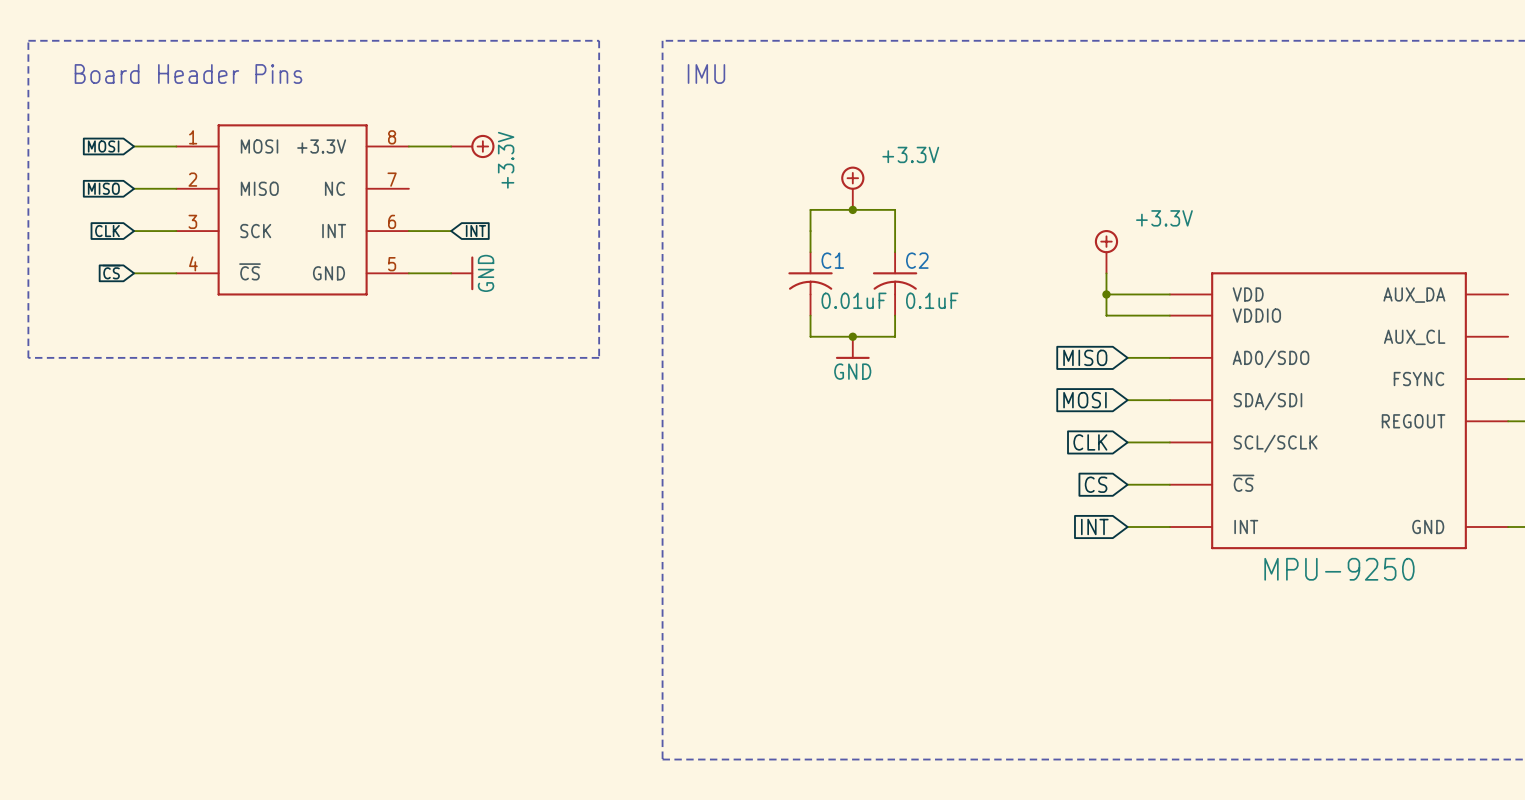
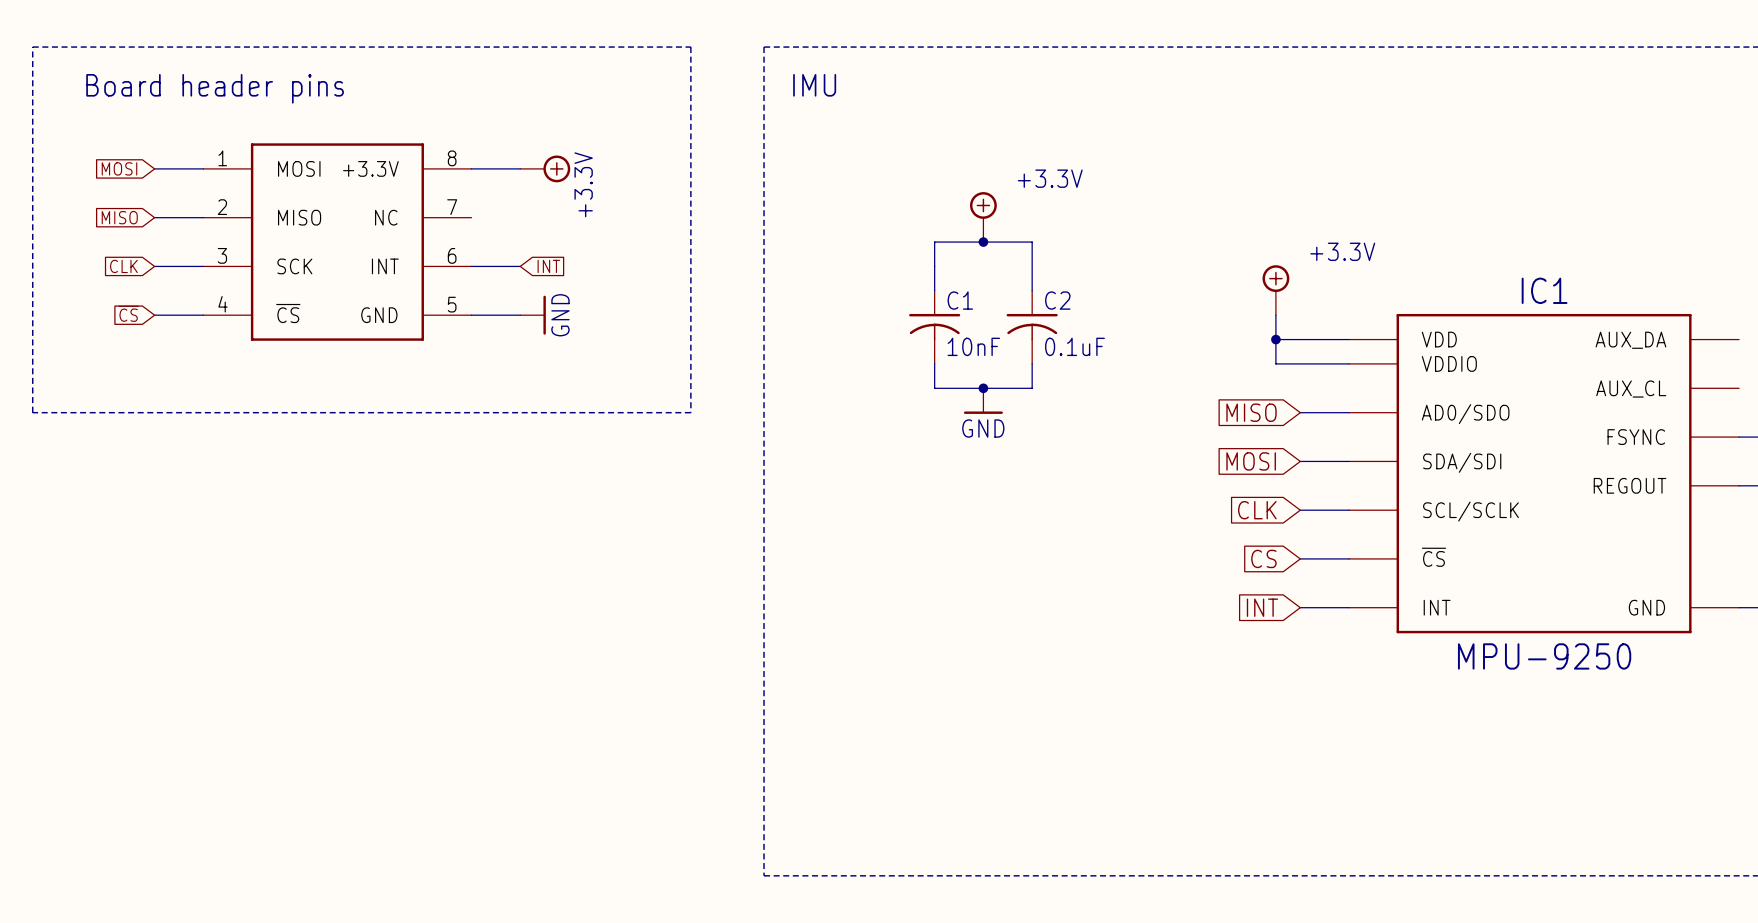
text: Board Header Pins (188, 73) -> Board header pins (215, 88)
IC1 name: none -> IC1 (1544, 290)
C1 value: 0.01uF (854, 300) -> 10nF (973, 346)

